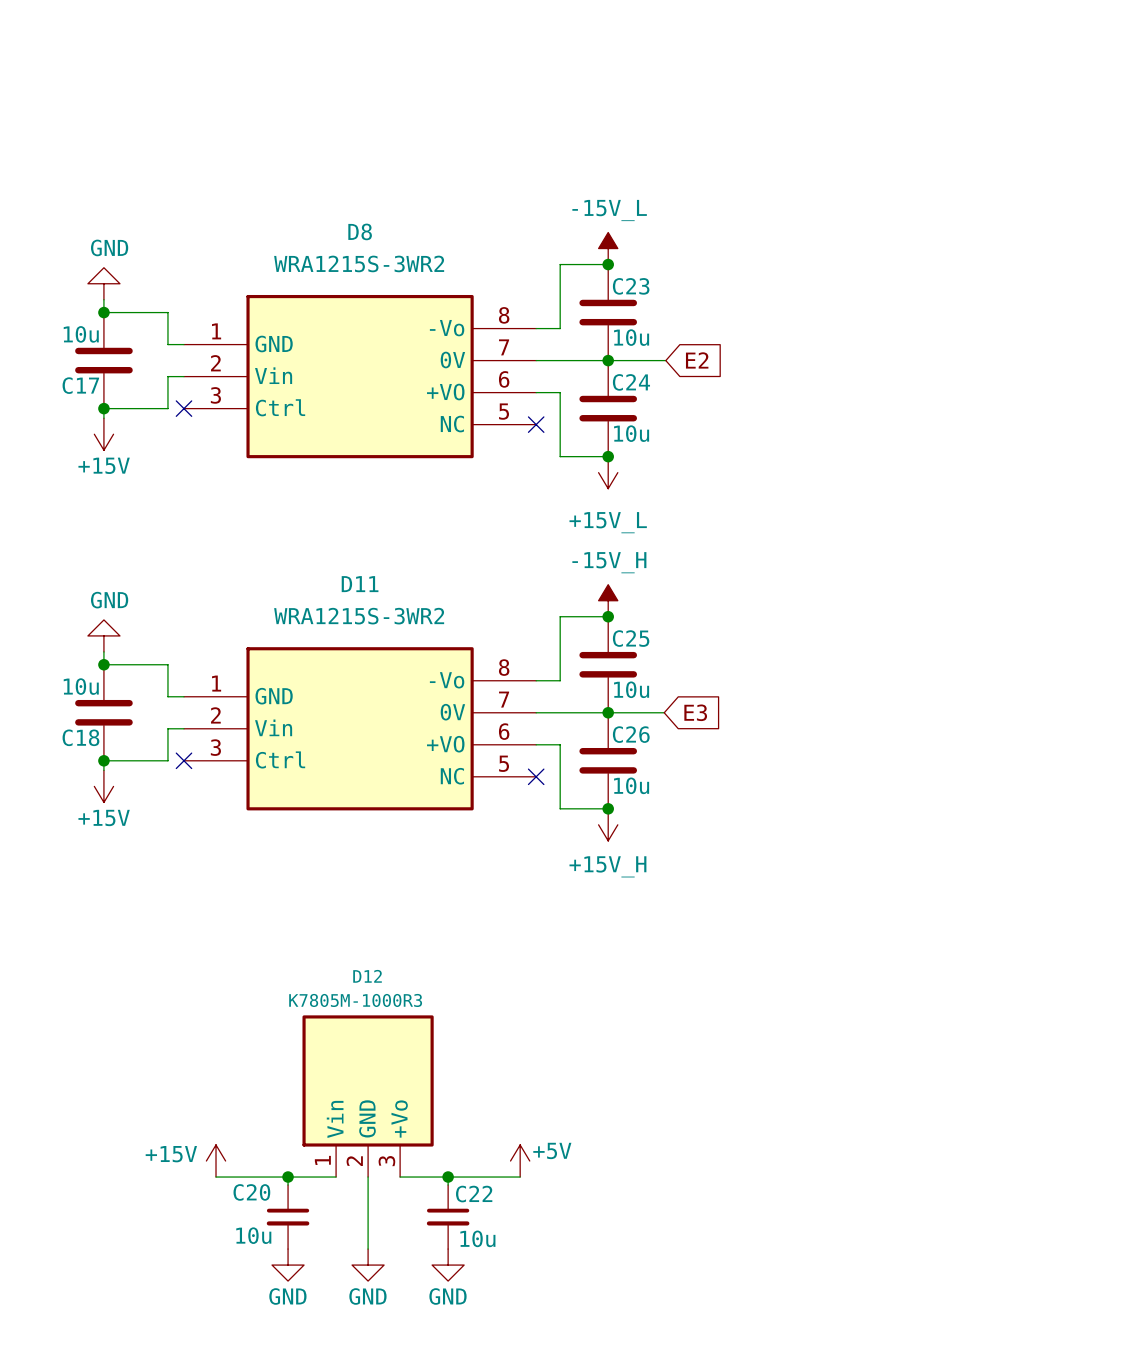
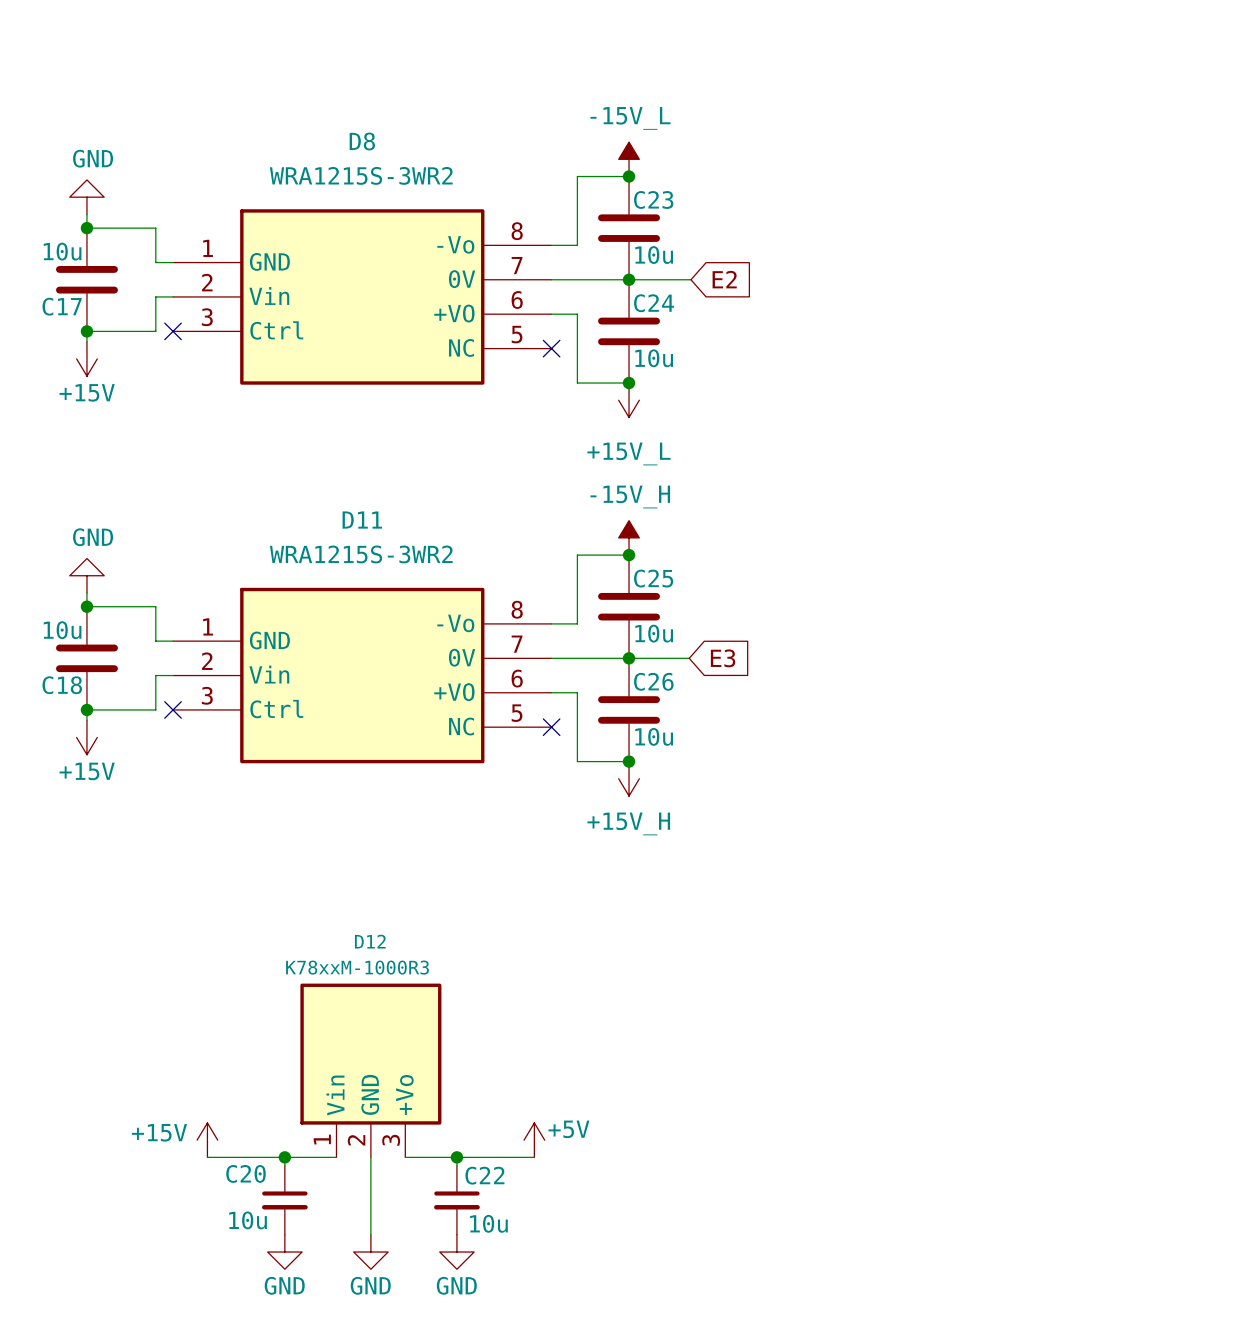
D12 value: K7805M-1000R3 (355, 1000) -> K78xxM-1000R3 (357, 967)

